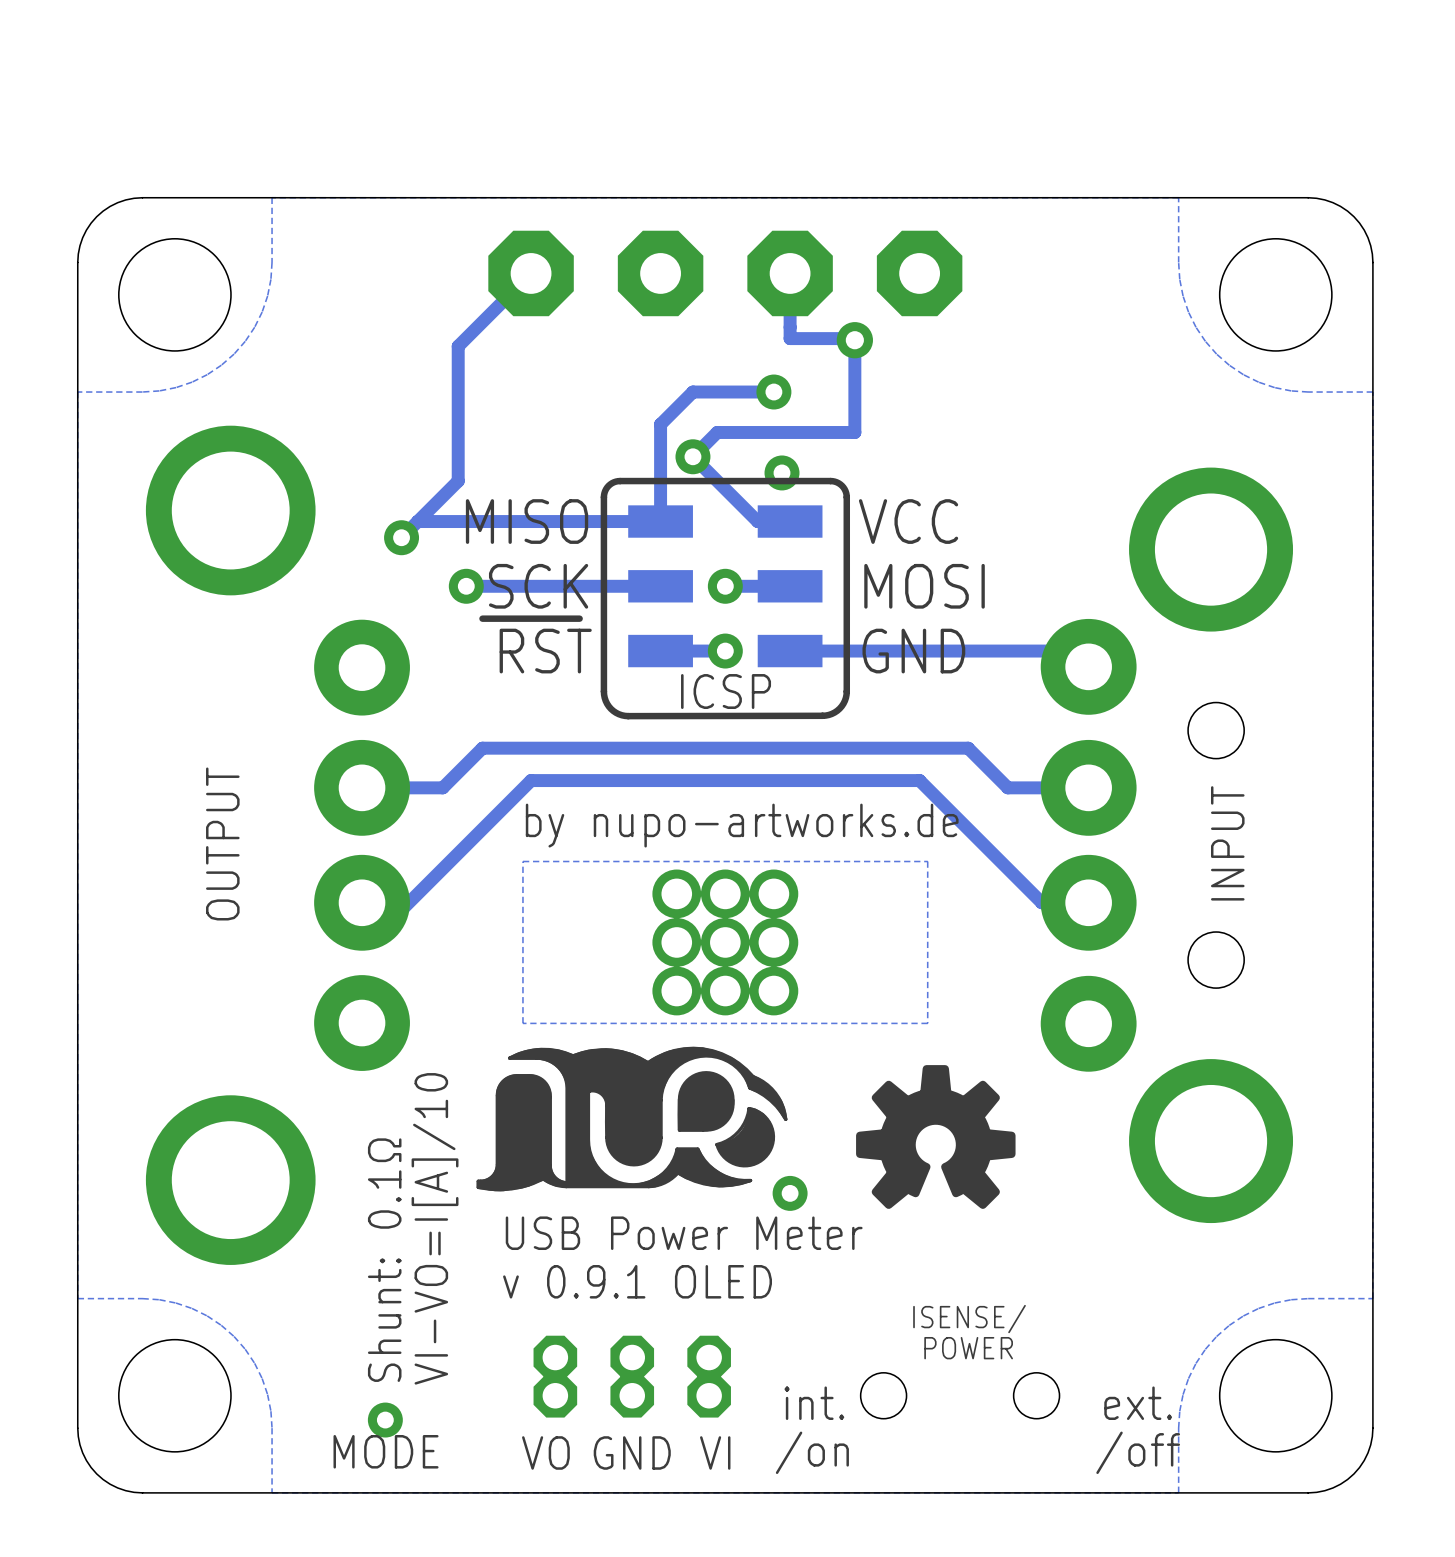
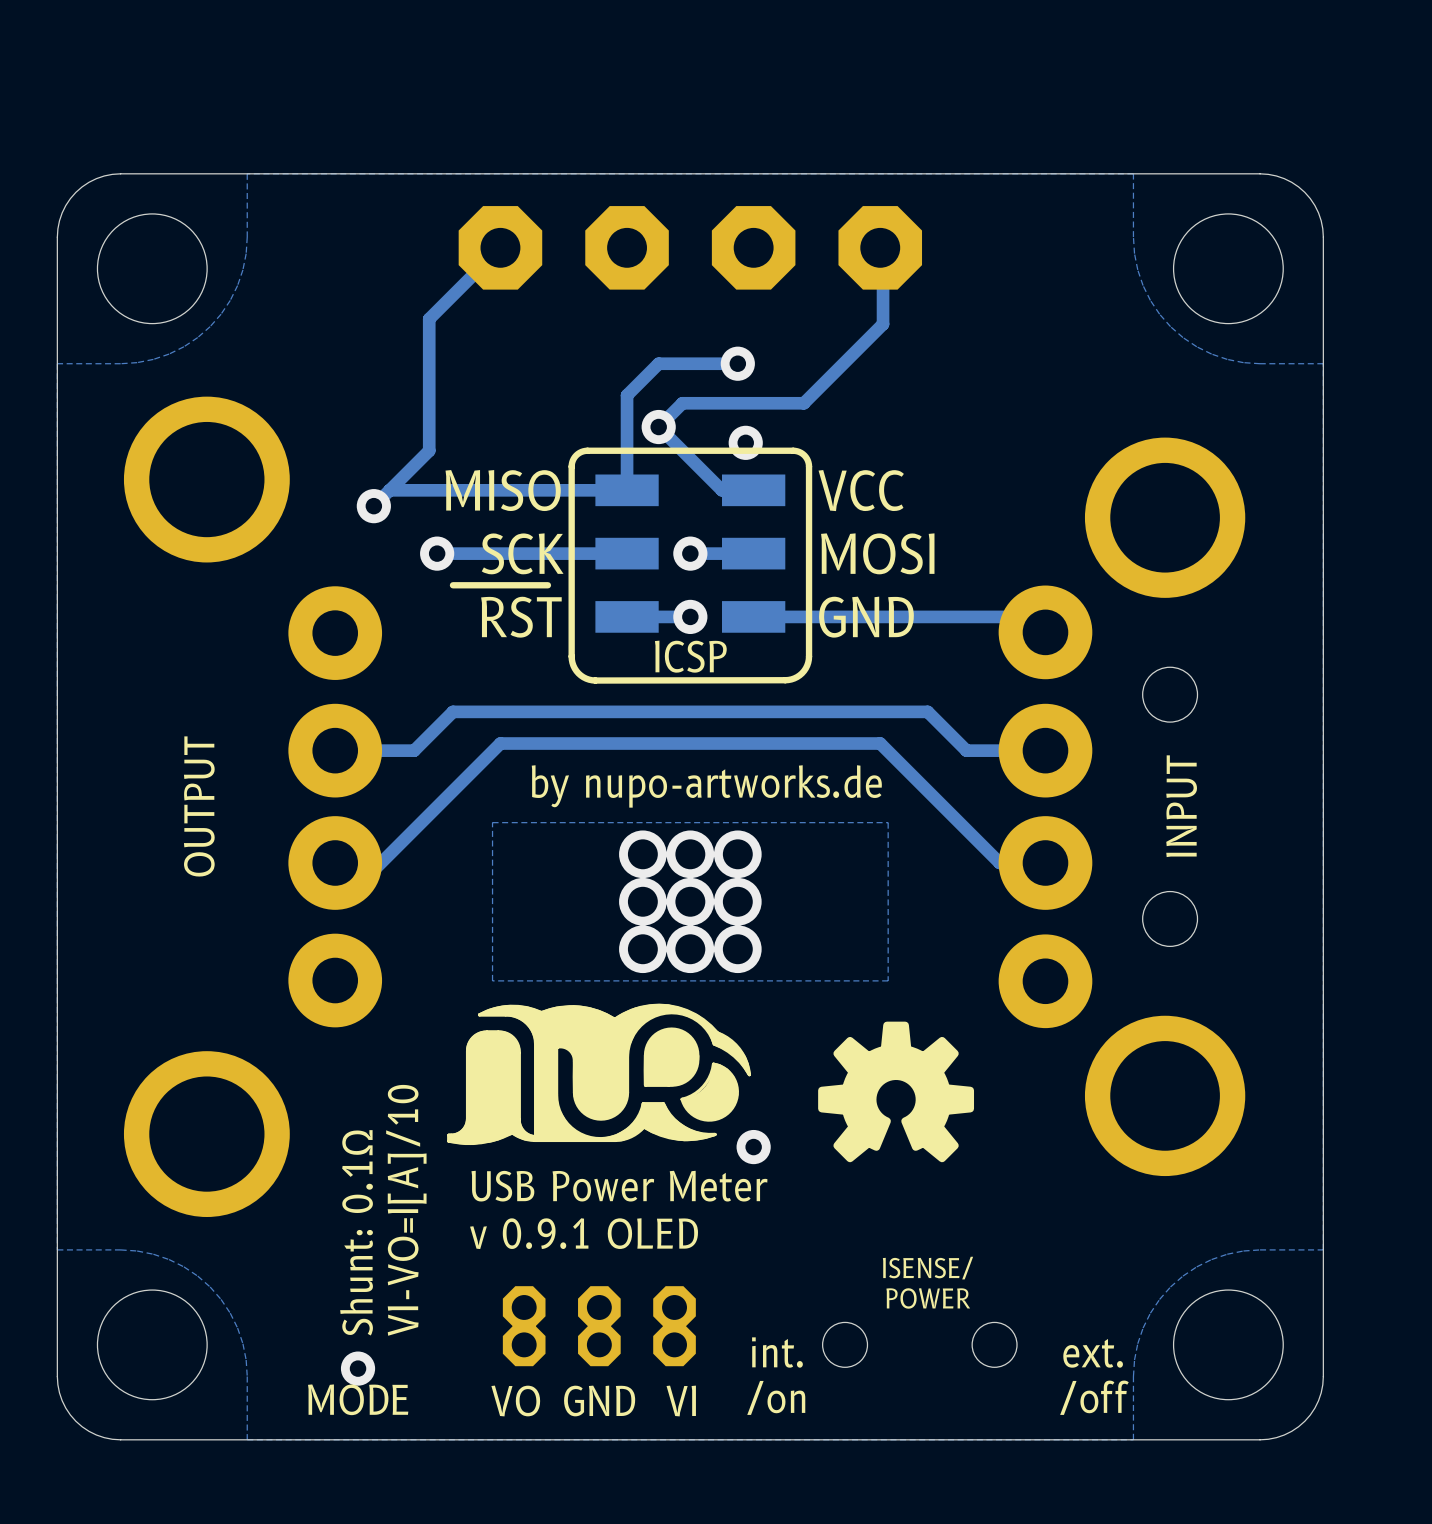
track: (790, 273) (790, 338) (854, 338) (854, 432) (841, 432) -> (880, 247) (883, 250) (883, 324) (803, 403)
via: (854, 340) -> none

